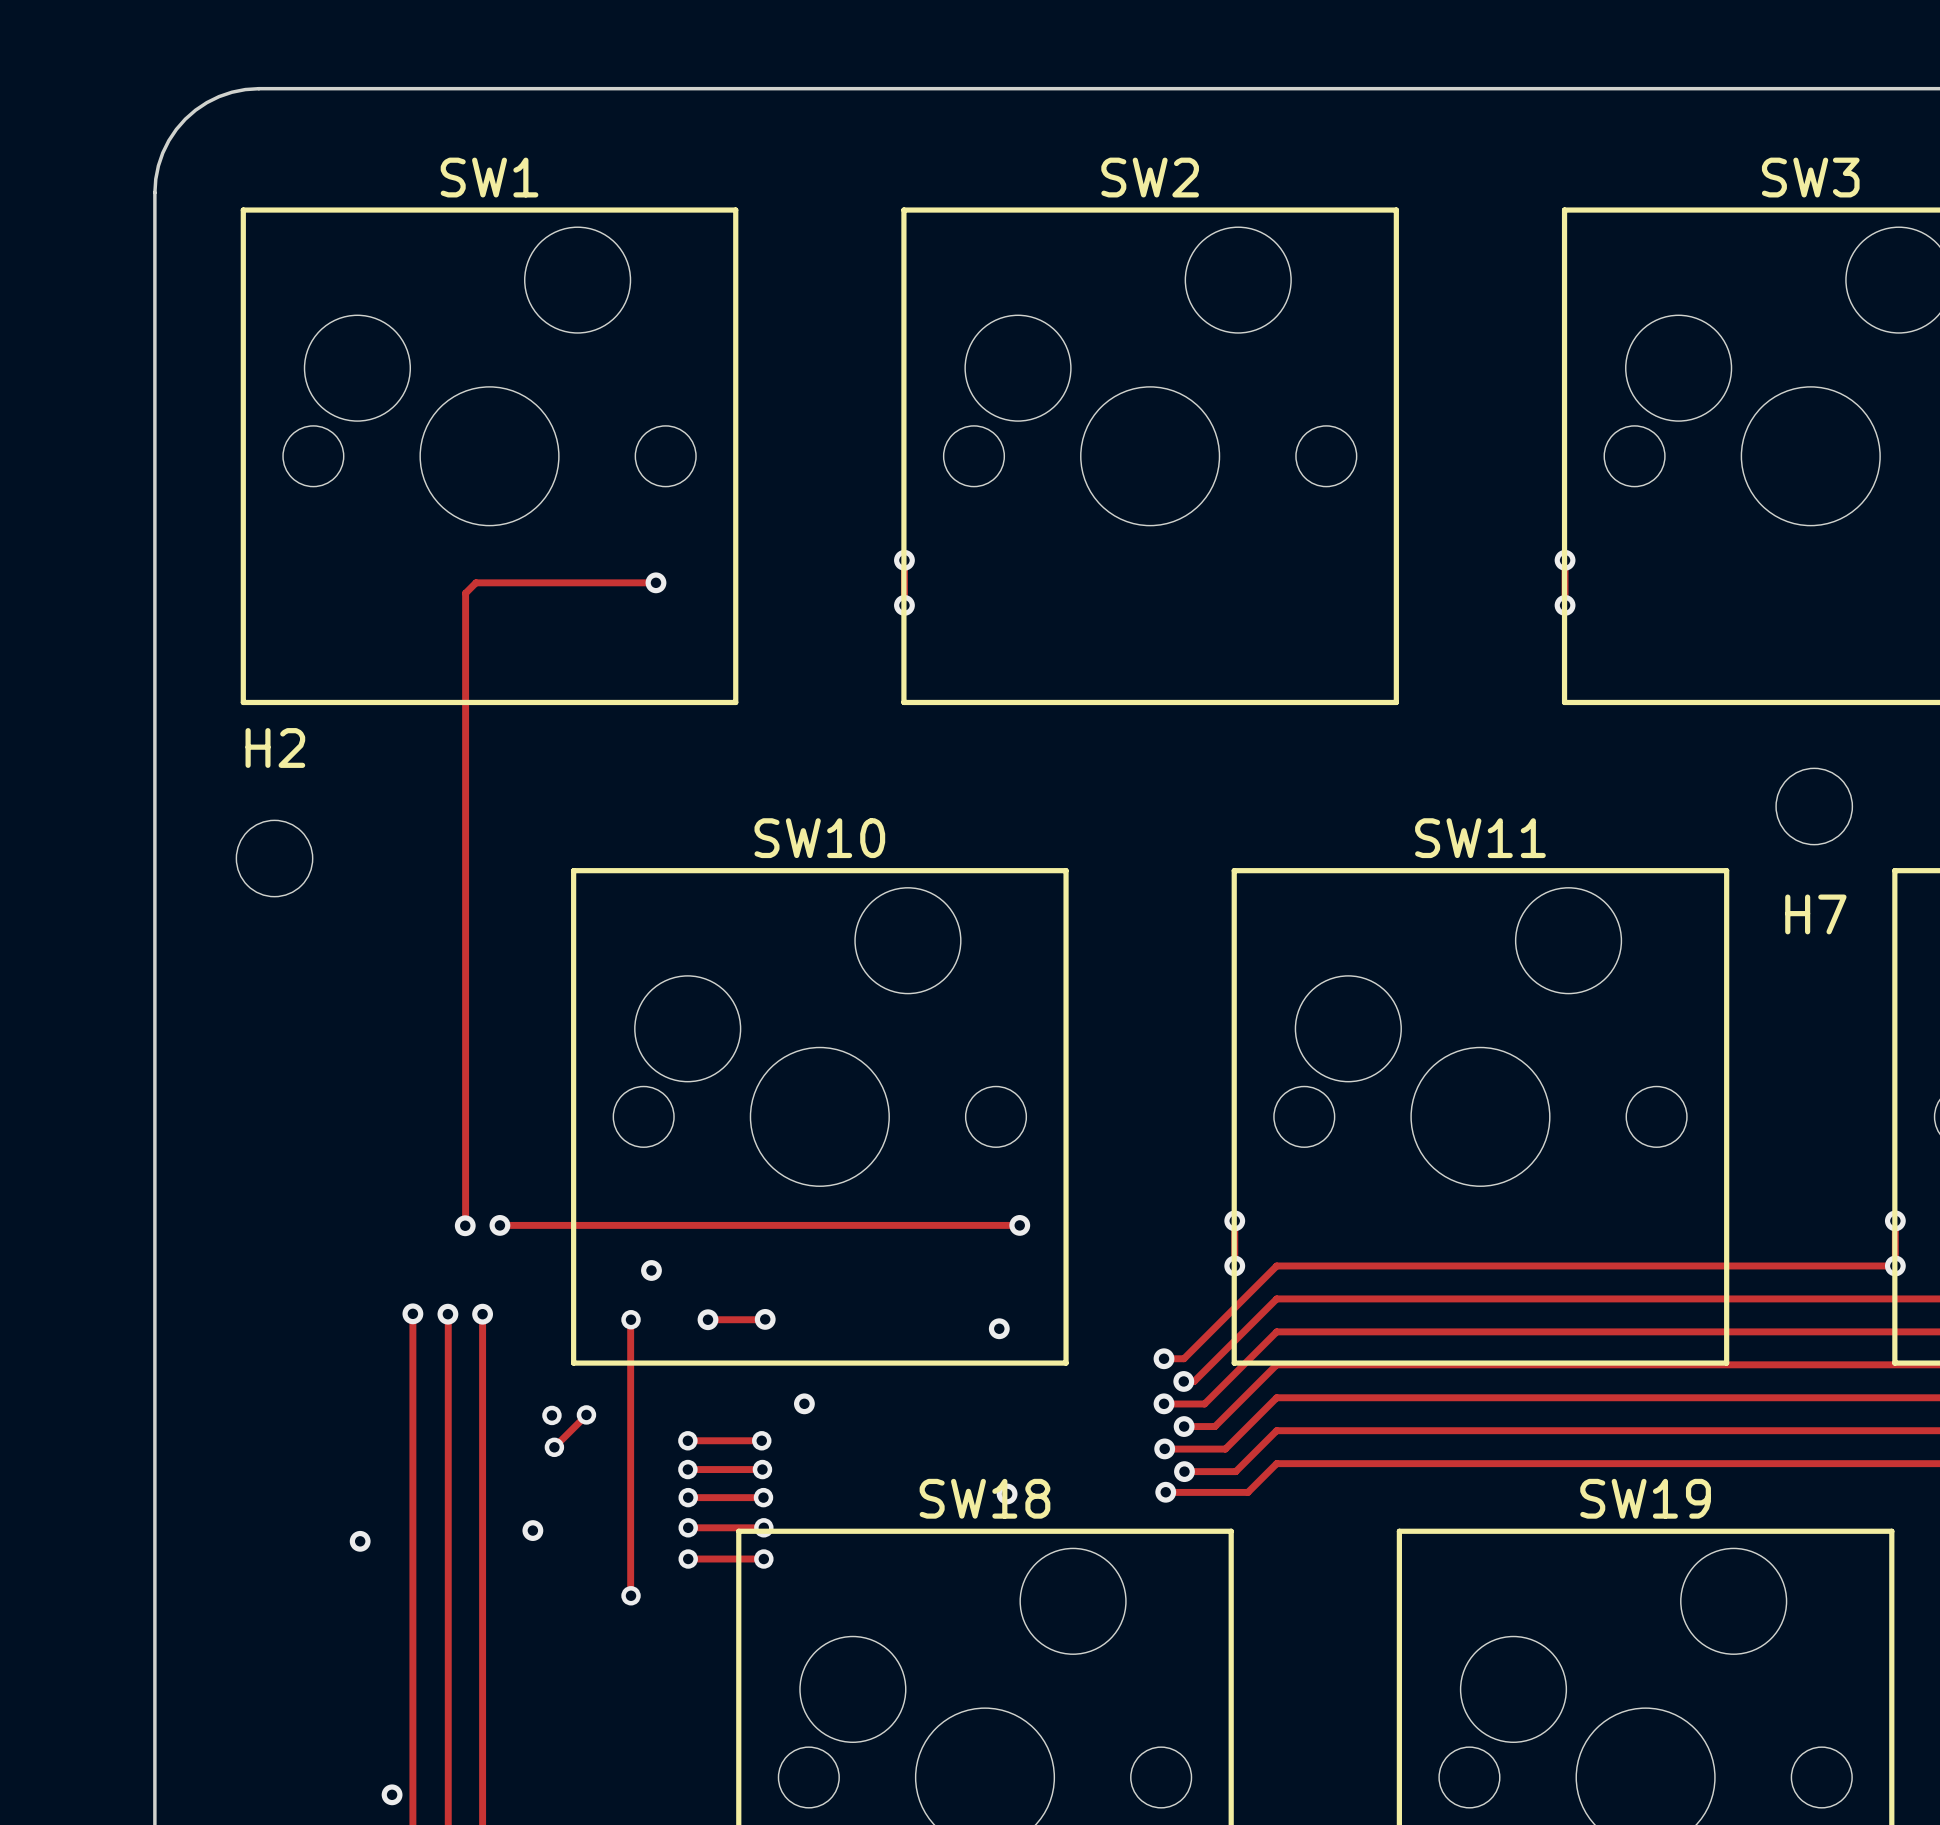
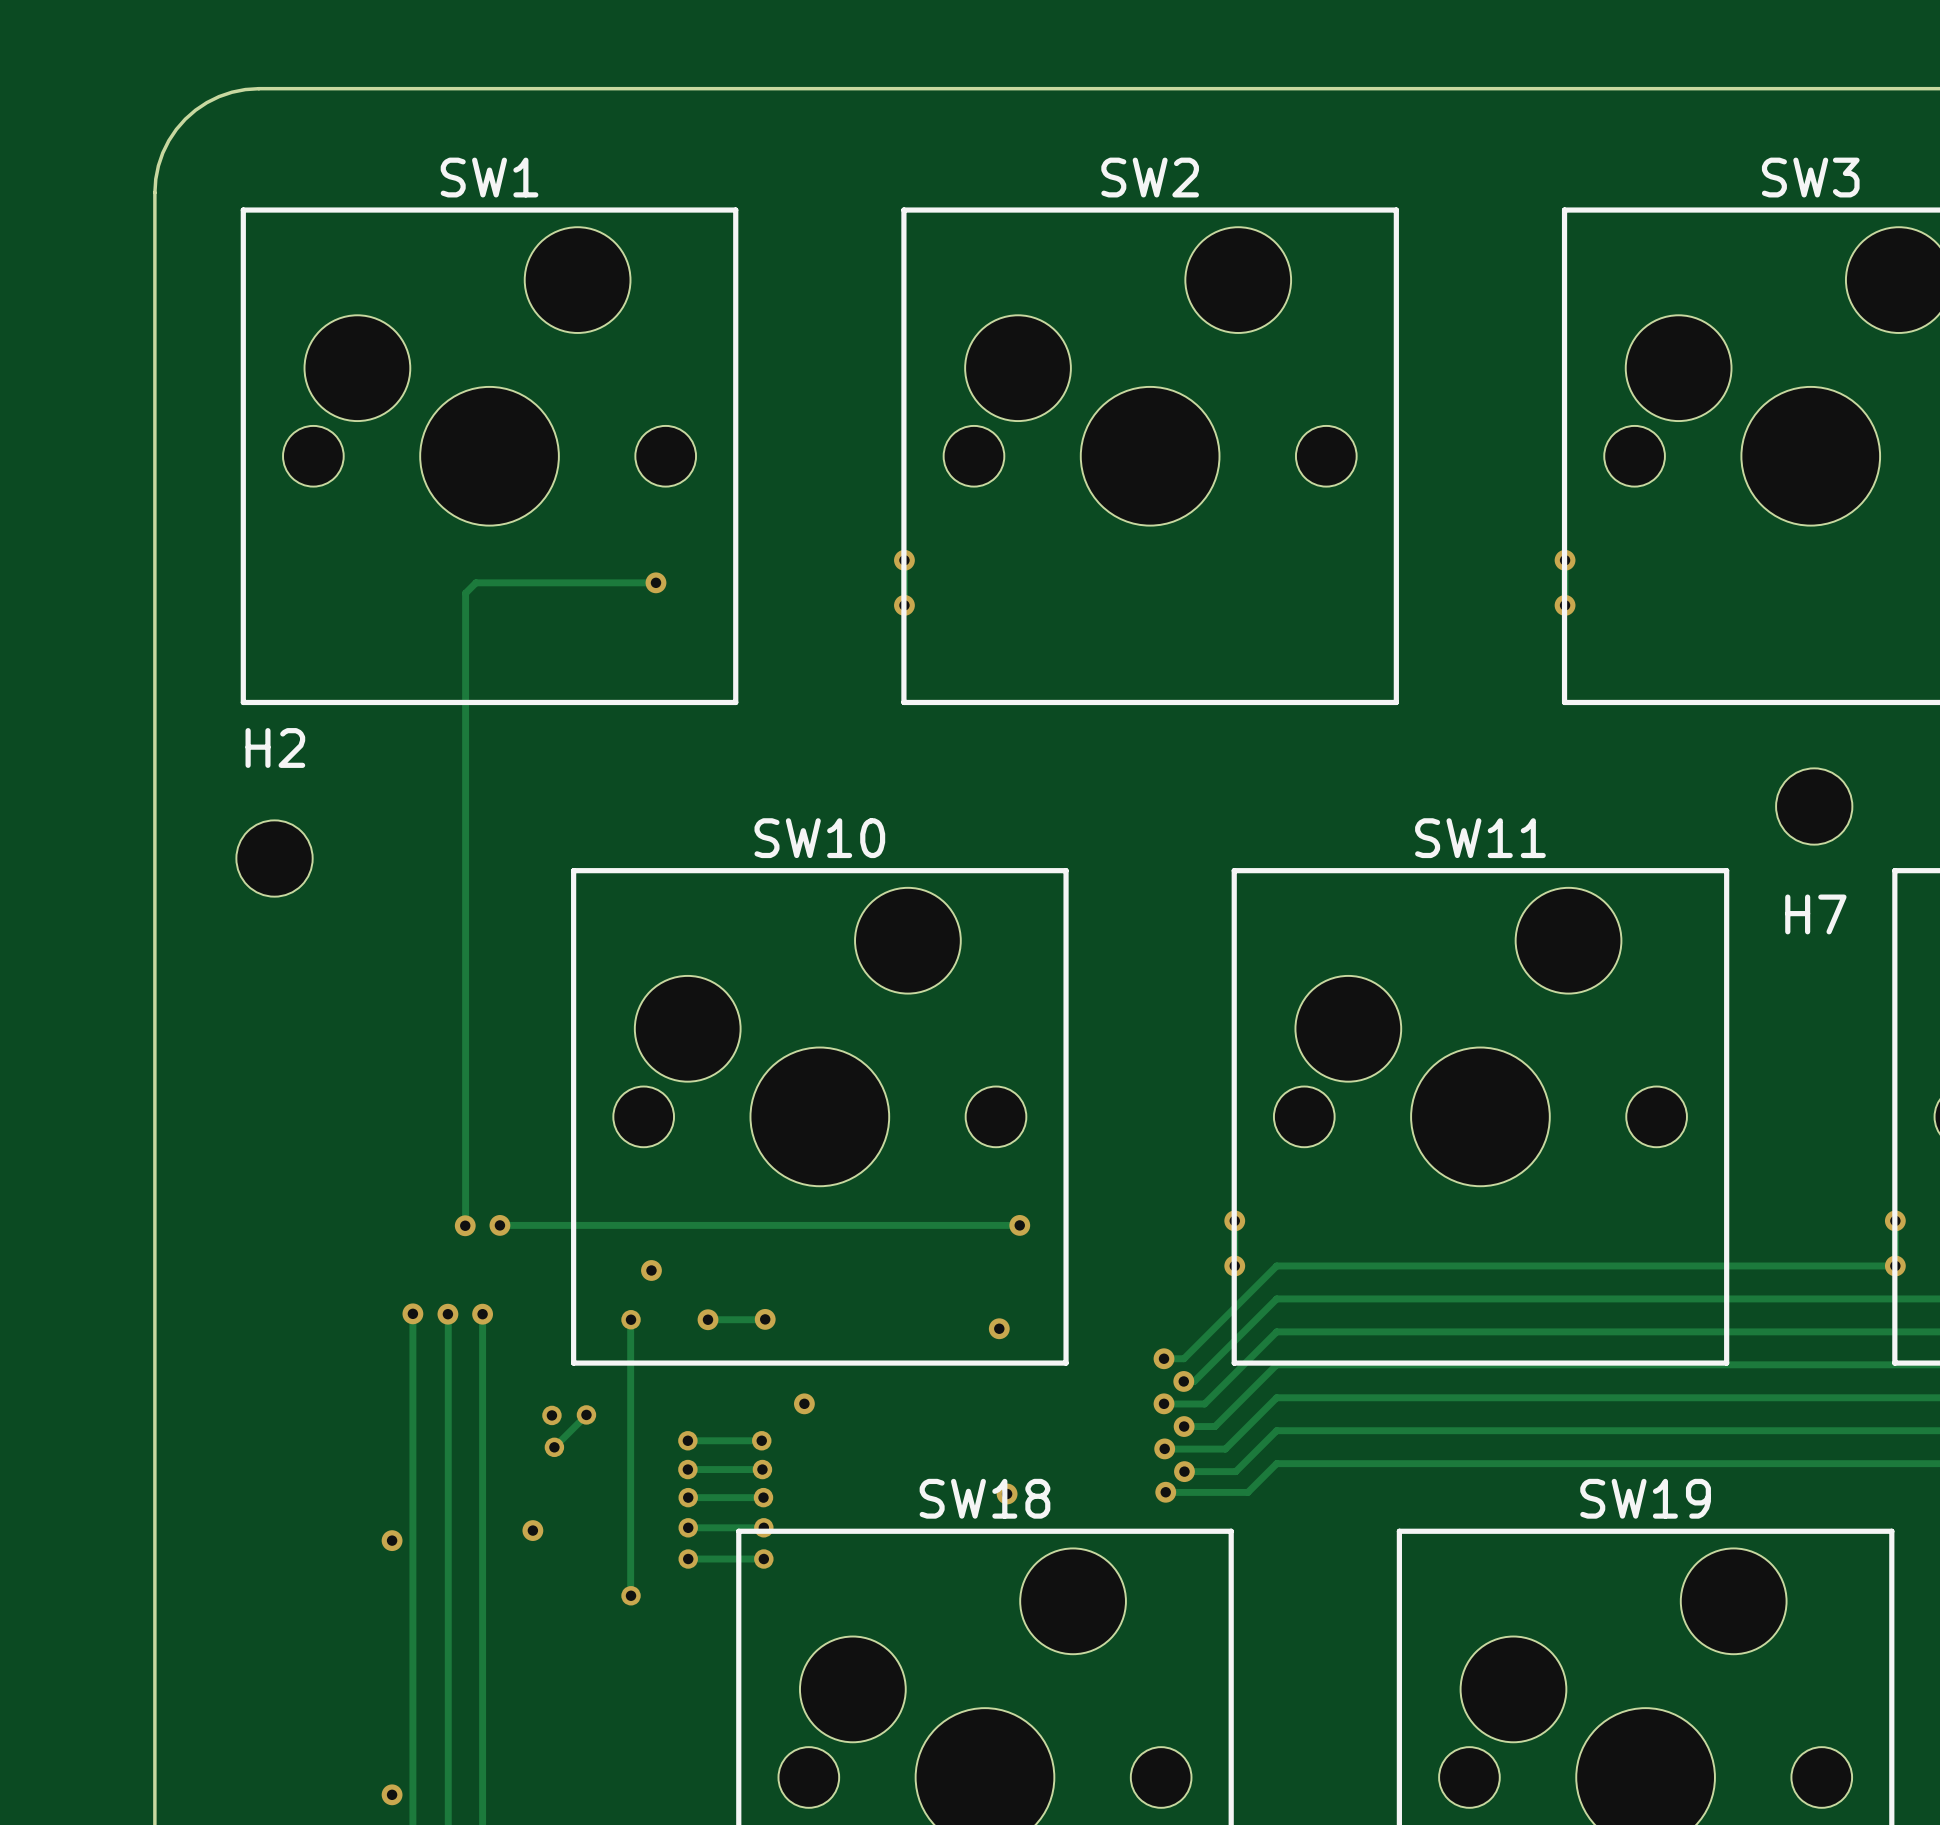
via position: (360, 1541) -> (392, 1540)

